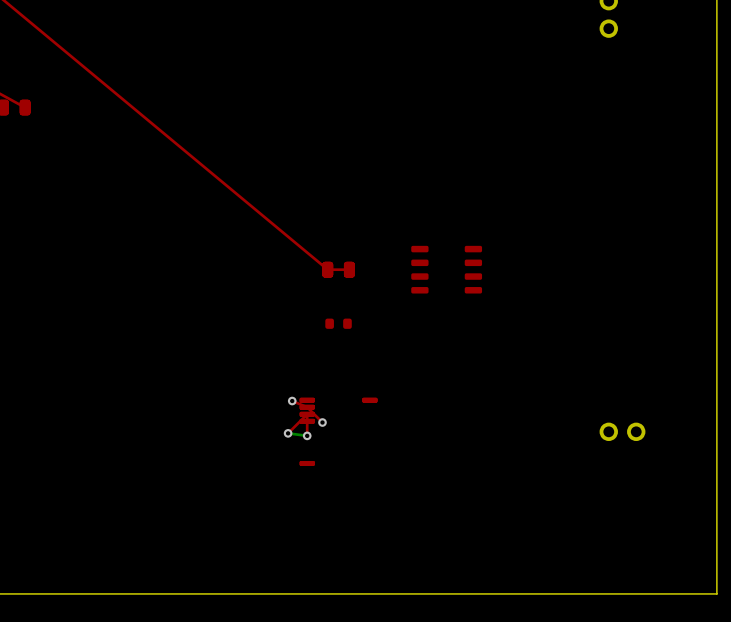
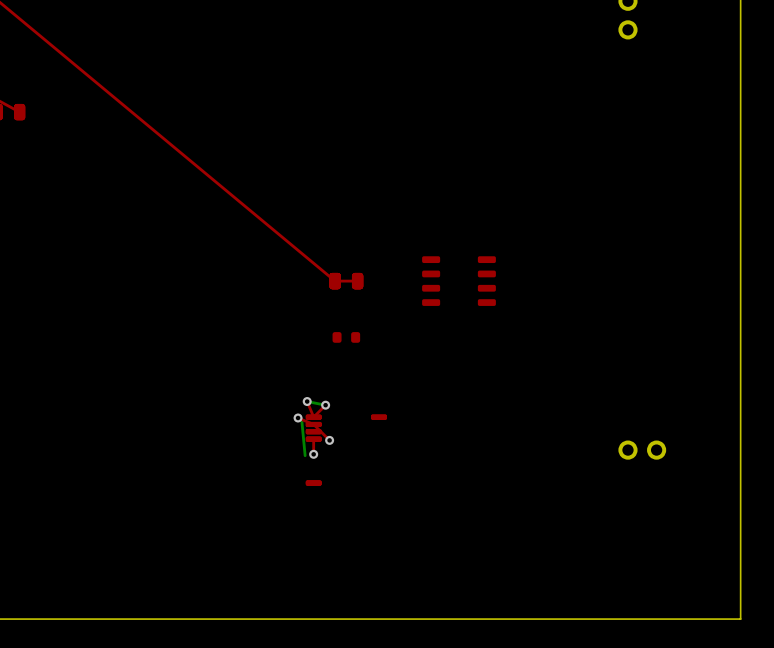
top track: none -> (307, 401) (313, 417) (325, 405)
bottom track: none -> (307, 401) (325, 405)
via: none -> (307, 401)
via: none -> (325, 405)
bottom track: none -> (301, 419) (305, 455)
top track: (307, 421) (307, 414) (288, 433) -> none
bottom track: (288, 433) (307, 435) -> none
via: (288, 433) -> none

